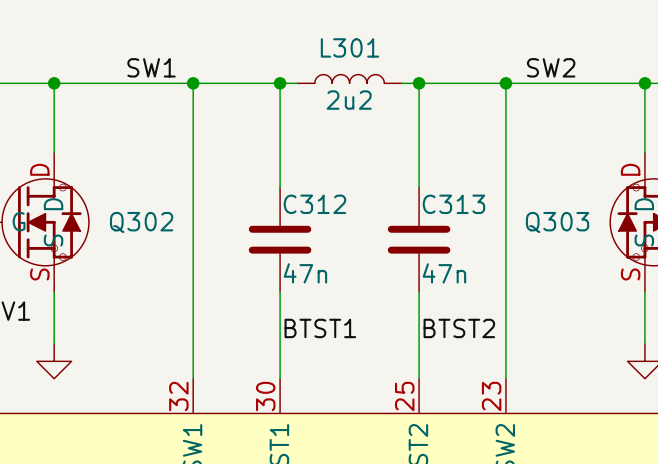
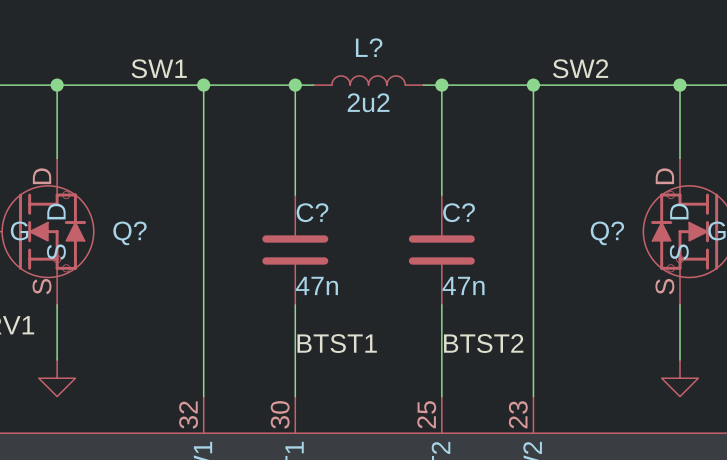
L301 name: L301 (349, 47) -> L? (369, 47)
C312 name: C312 (314, 204) -> C? (312, 212)
C313 name: C313 (453, 204) -> C? (459, 212)
Q302 name: Q302 (141, 222) -> Q? (129, 233)
Q303 name: Q303 (557, 222) -> Q? (607, 233)

